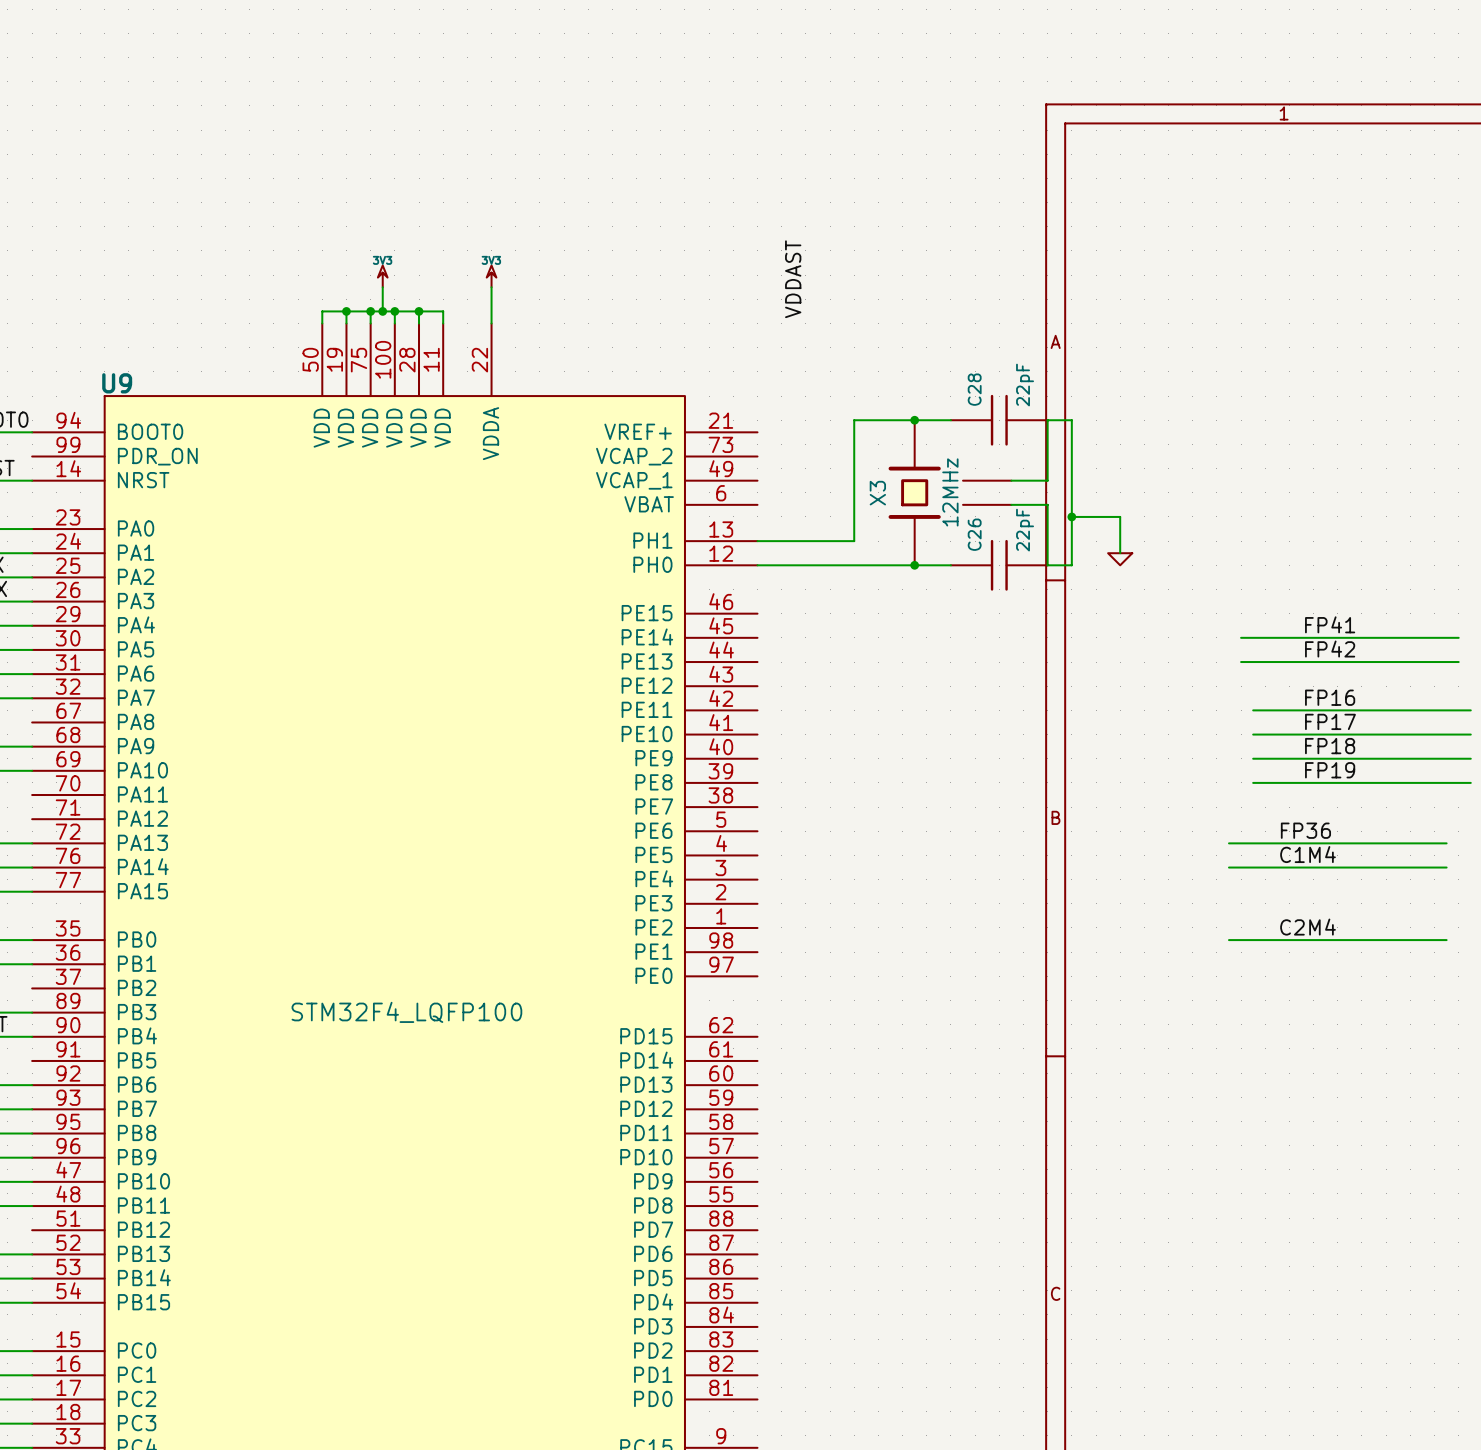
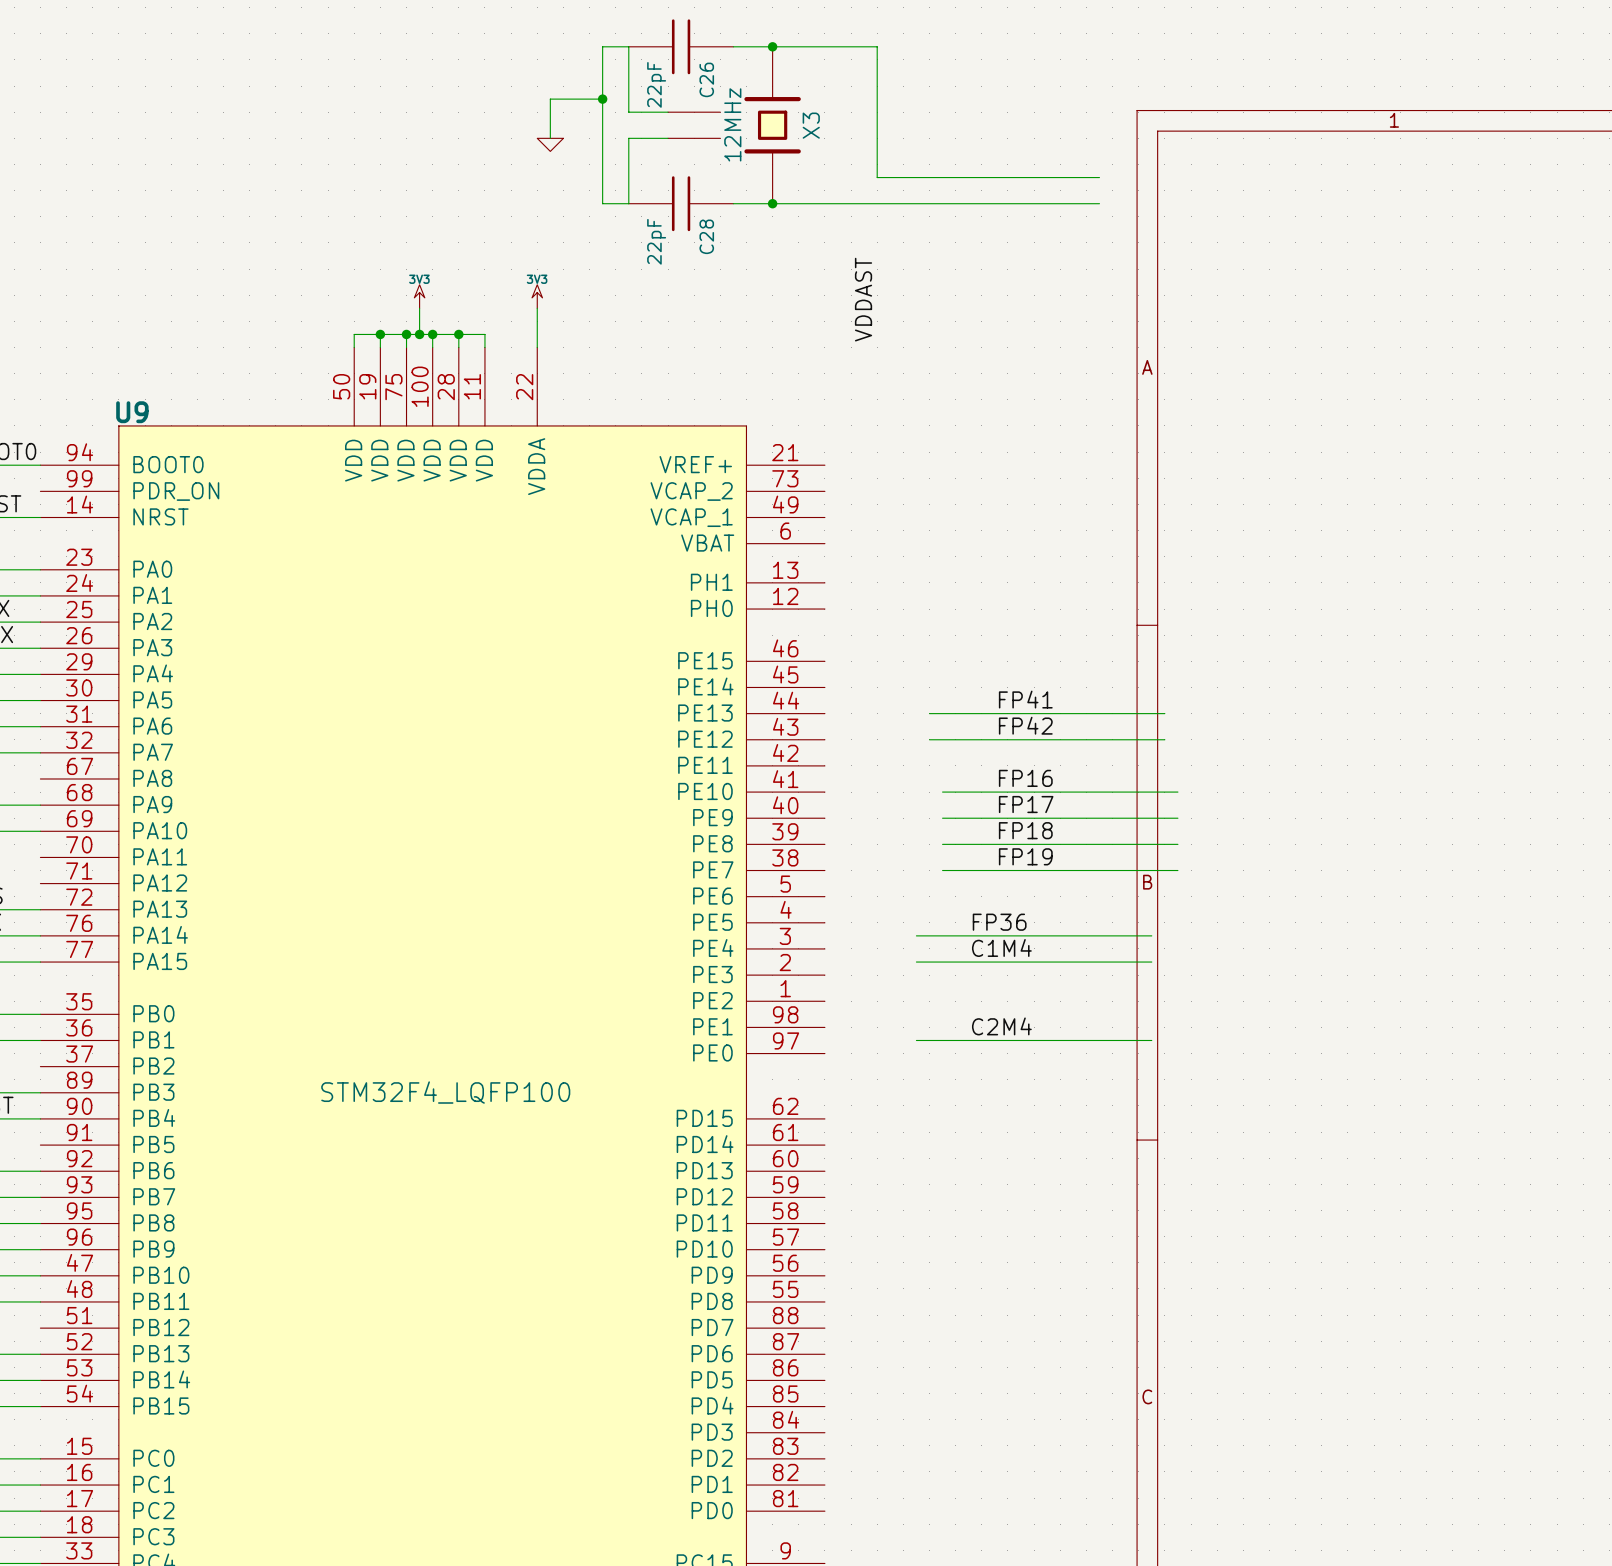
wire: none -> (733, 46) (877, 46) (877, 177) (1099, 177)
junction: none -> (772, 46)
wire: none -> (602, 99) (550, 99) (550, 138)
junction: none -> (602, 99)
wire: none -> (668, 112) (628, 112) (628, 46) (602, 46) (602, 203) (628, 203) (628, 138) (668, 138)
power symbol: none -> (550, 144)
wire: none -> (733, 203) (1099, 203)
junction: none -> (772, 203)
C28 value position: 22pF (1025, 385) -> 22pF (656, 241)
C28 name position: C28 (974, 389) -> C28 (706, 236)
junction: (914, 420) -> none
wire: (950, 420) (854, 420) (854, 541) (757, 541) -> none
C28 position: (999, 420) -> (681, 203)
wire: (1011, 480) (1047, 480) (1047, 420) (1071, 420) (1071, 565) (1047, 565) (1047, 504) (1011, 504) -> none
X3 rotation: 0° (914, 492) -> 180° (772, 125)
X3 position: (949, 492) -> (734, 125)
wire: (1071, 516) (1120, 516) (1120, 553) -> none
junction: (1071, 516) -> none
C26 value position: 22pF (1025, 530) -> 22pF (656, 84)
C26 name position: C26 (974, 534) -> C26 (706, 79)
power symbol: (1120, 559) -> none
wire: (757, 565) (950, 565) -> none
junction: (914, 565) -> none
C26 position: (999, 565) -> (681, 46)
label: FP41 (1330, 624) -> none
wire: (1241, 637) (1458, 637) -> none
label: none -> FP41 (1025, 699)
label: FP42 (1330, 649) -> none
wire: none -> (929, 713) (1164, 713)
wire: (1241, 662) (1458, 662) -> none
label: none -> FP42 (1025, 725)
wire: none -> (929, 739) (1164, 739)
label: FP16 (1330, 697) -> none
wire: (1253, 710) (1470, 710) -> none
label: none -> FP16 (1025, 778)
label: FP17 (1330, 721) -> none
wire: none -> (942, 792) (1177, 792)
wire: (1253, 734) (1470, 734) -> none
label: none -> FP17 (1026, 804)
label: FP18 (1330, 746) -> none
wire: none -> (942, 818) (1177, 818)
wire: (1253, 758) (1470, 758) -> none
label: none -> FP18 (1025, 830)
label: FP19 (1330, 770) -> none
wire: none -> (942, 844) (1177, 844)
wire: (1253, 782) (1470, 782) -> none
label: none -> FP19 (1025, 856)
wire: none -> (942, 870) (1177, 870)
label: FP36 (1305, 830) -> none
wire: (1228, 843) (1446, 843) -> none
label: none -> FP36 (999, 922)
label: C1M4 (1308, 854) -> none
wire: none -> (916, 935) (1151, 935)
wire: (1228, 867) (1446, 867) -> none
label: none -> C1M4 (1001, 947)
wire: none -> (916, 962) (1151, 962)
label: C2M4 (1308, 927) -> none
wire: (1228, 940) (1446, 940) -> none
label: none -> C2M4 (1001, 1026)
wire: none -> (916, 1040) (1151, 1040)

